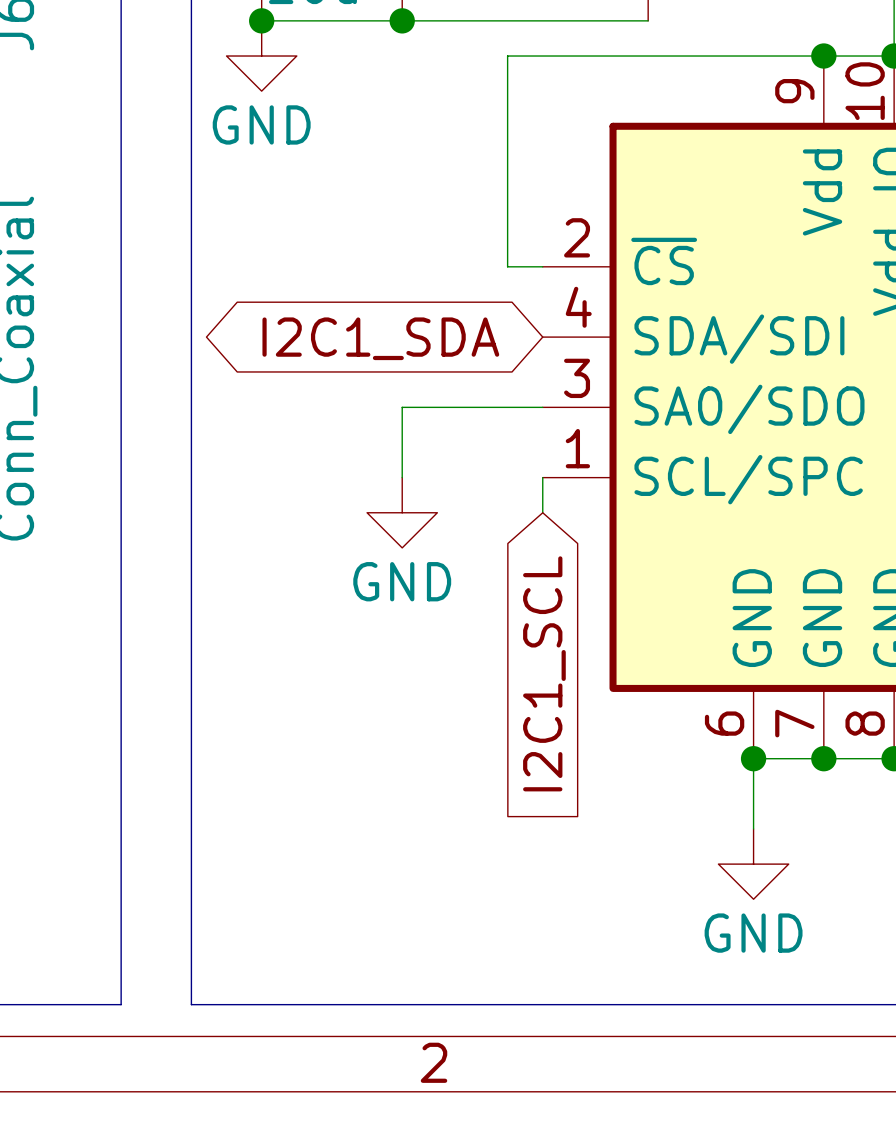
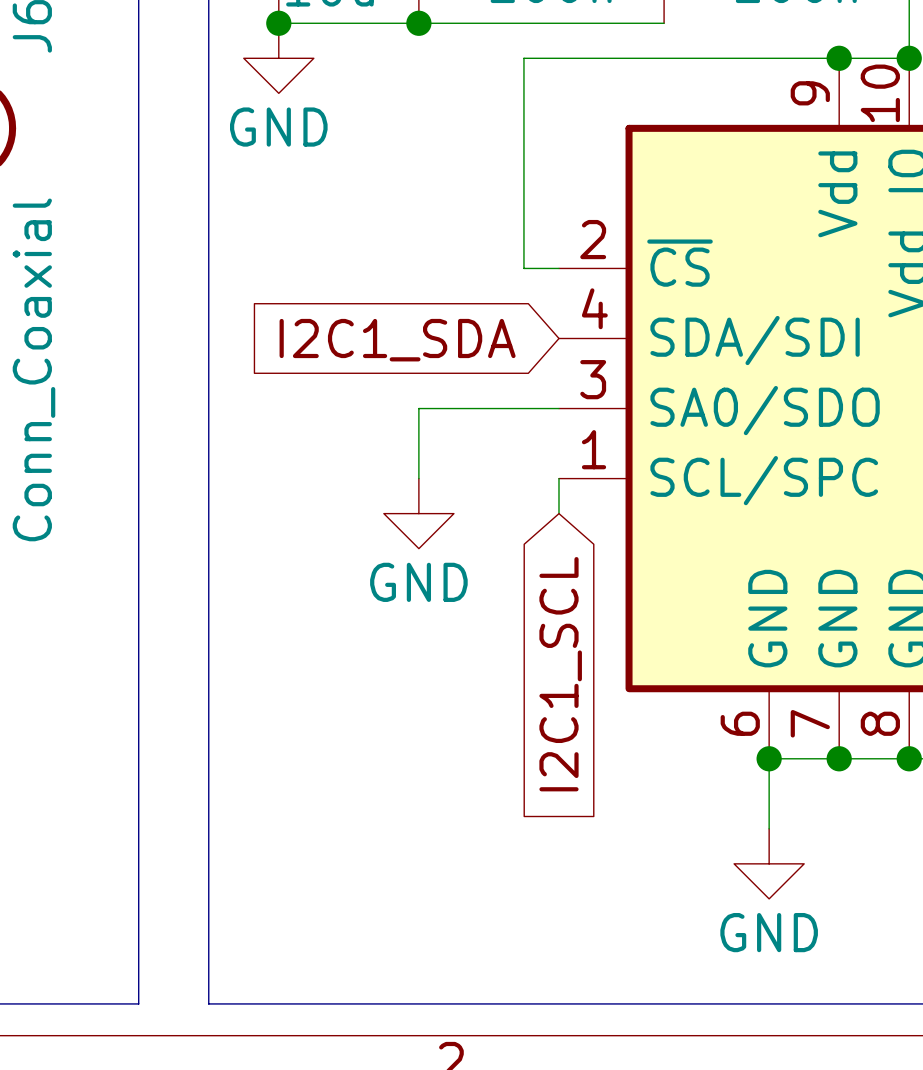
global label shape: bidirectional (380, 338) -> input (397, 340)

